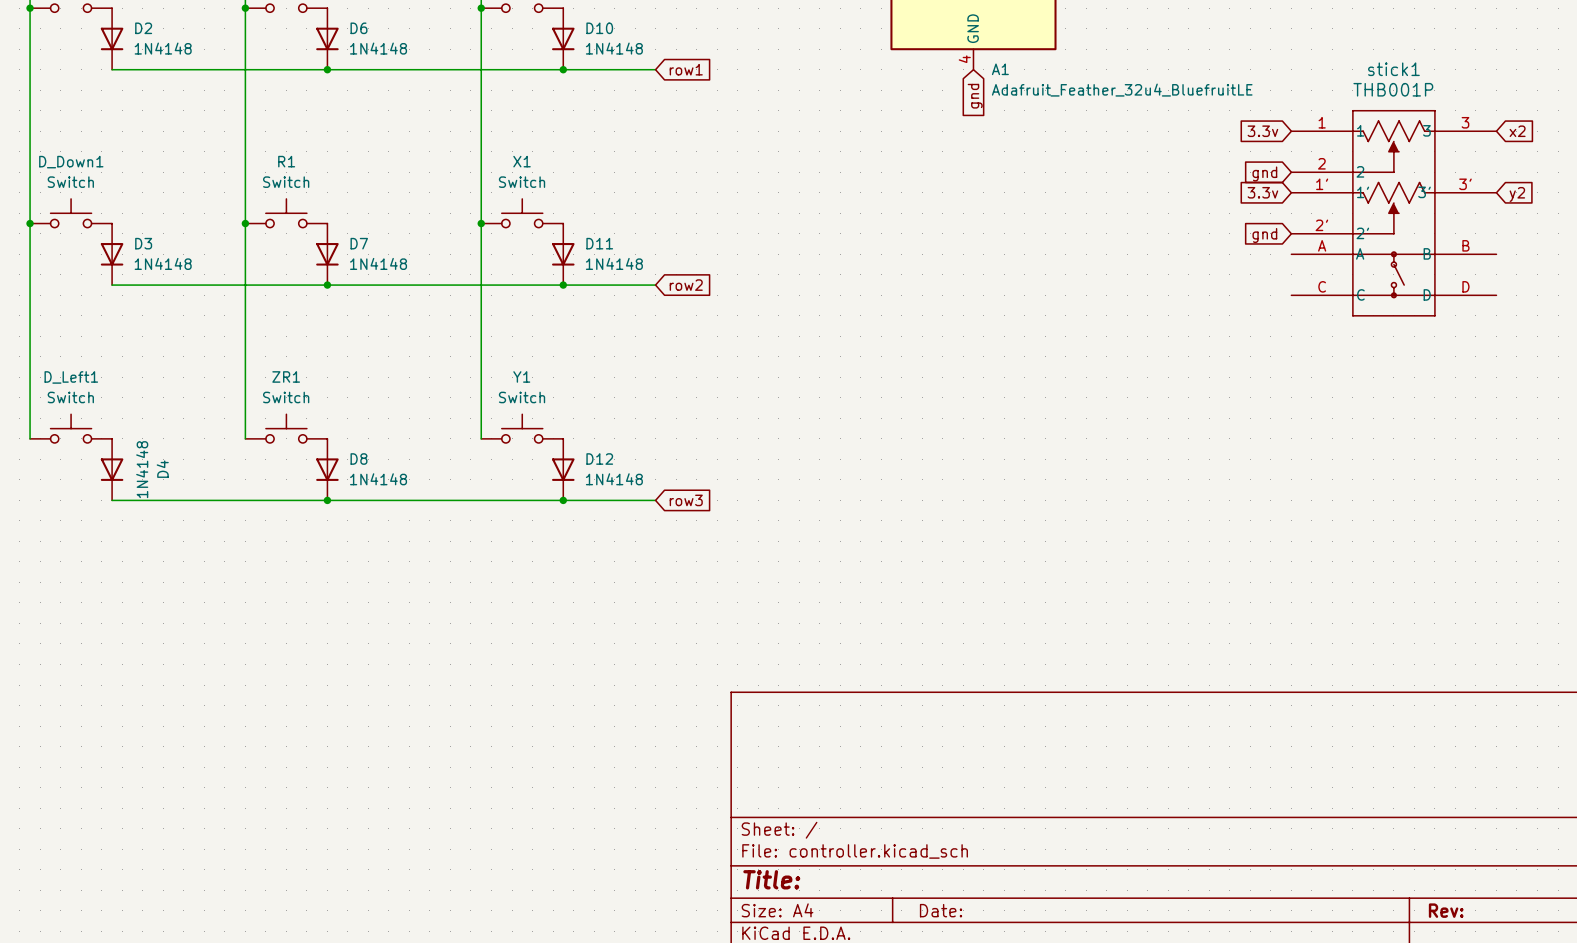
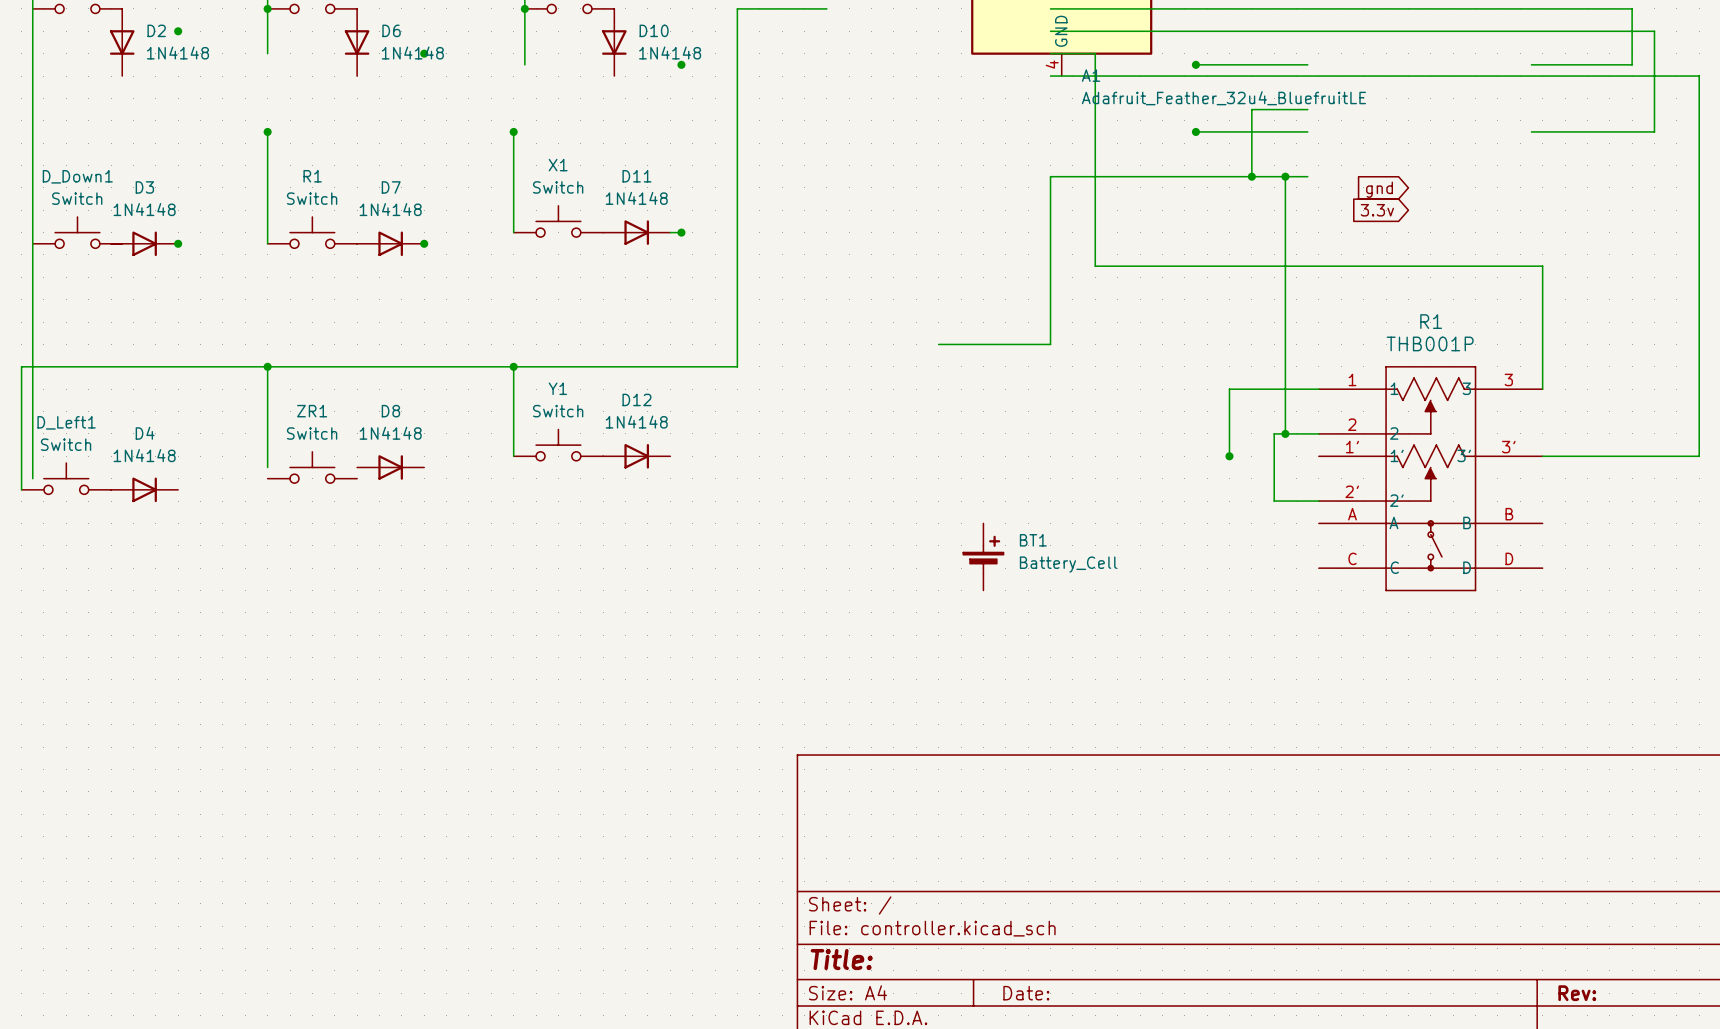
junction: (30, 8) -> none
wire: none -> (826, 8) (737, 8) (737, 366) (21, 366) (21, 489)
wire: none -> (1050, 8) (1632, 8) (1632, 64) (1531, 64)
junction: none -> (178, 31)
wire: none -> (1050, 31) (1654, 31) (1654, 131) (1531, 131)
wire: (245, 49) (245, 120) -> none
junction: none -> (424, 53)
wire: none -> (1050, 53) (1095, 53) (1095, 266) (1542, 266) (1542, 389)
wire: (481, 59) (481, 438) -> none
junction: none -> (681, 64)
wire: none -> (1195, 64) (1307, 64)
junction: none -> (1195, 64)
wire: (112, 69) (655, 69) -> none
junction: (327, 69) -> none
junction: (563, 69) -> none
global label: row1 (686, 69) -> none
wire: none -> (1050, 76) (1699, 76) (1699, 456) (1542, 456)
global label: gnd (975, 96) -> none
wire: none -> (1307, 109) (1251, 109) (1251, 176)
junction: none -> (267, 131)
wire: none -> (513, 131) (513, 232)
junction: none -> (513, 131)
wire: none -> (1195, 131) (1307, 131)
junction: none -> (1195, 131)
global label: 3.3v (1262, 131) -> none
global label: x2 (1517, 131) -> none
junction: none -> (1251, 176)
wire: none -> (1285, 176) (1285, 433)
junction: none -> (1285, 176)
wire: none -> (1307, 176) (1050, 176) (1050, 344) (938, 344)
global label: y2 (1517, 194) -> none
X1 position: (522, 213) -> (558, 221)
wire: none -> (670, 232) (681, 232)
junction: none -> (681, 232)
stick1: THB001P (1393, 213) -> none
junction: (30, 223) -> none
junction: none -> (178, 243)
wire: (245, 223) (245, 336) -> none
junction: (245, 223) -> none
junction: none -> (424, 243)
junction: (481, 223) -> none
global label: gnd (1264, 235) -> none
D3 name position: D3 (143, 243) -> D3 (144, 187)
D7 name position: D7 (359, 243) -> D7 (391, 187)
D11 name position: D11 (599, 243) -> D11 (636, 176)
D3 rotation: 0° (112, 254) -> 90° counterclockwise (144, 243)
D3 position: (112, 254) -> (144, 243)
D7 rotation: 0° (327, 254) -> 90° counterclockwise (390, 243)
D7 position: (327, 254) -> (390, 243)
D11 rotation: 0° (563, 254) -> 90° counterclockwise (636, 232)
D11 position: (563, 254) -> (636, 232)
D3 value position: 1N4148 (163, 263) -> 1N4148 (144, 209)
D7 value position: 1N4148 (378, 263) -> 1N4148 (390, 209)
D11 value position: 1N4148 (614, 263) -> 1N4148 (636, 198)
wire: (112, 285) (655, 285) -> none
junction: (327, 285) -> none
junction: (563, 285) -> none
global label: row2 (686, 285) -> none
junction: none -> (267, 366)
wire: none -> (513, 366) (513, 456)
junction: none -> (513, 366)
wire: none -> (1318, 389) (1229, 389) (1229, 456)
junction: none -> (1285, 433)
wire: none -> (1318, 433) (1274, 433) (1274, 501) (1318, 501)
junction: none -> (1229, 456)
D_Left1 position: (71, 428) -> (66, 478)
wire: (245, 428) (245, 438) -> none
Y1 position: (522, 428) -> (558, 445)
R1: none -> THB001P (1430, 478)
D8 name position: D8 (359, 459) -> D8 (390, 411)
D12 name position: D12 (599, 459) -> D12 (636, 399)
D4 rotation: 0° (112, 469) -> 90° counterclockwise (144, 489)
D8 rotation: 0° (327, 469) -> 90° counterclockwise (390, 467)
D8 position: (327, 469) -> (390, 467)
D12 rotation: 0° (563, 469) -> 90° counterclockwise (636, 456)
D12 position: (563, 469) -> (636, 456)
D8 value position: 1N4148 (378, 479) -> 1N4148 (390, 433)
D12 value position: 1N4148 (614, 479) -> 1N4148 (636, 422)
wire: (112, 500) (655, 500) -> none
junction: (327, 500) -> none
junction: (563, 500) -> none
global label: row3 (686, 500) -> none
BT1: none -> Battery_Cell (983, 556)

